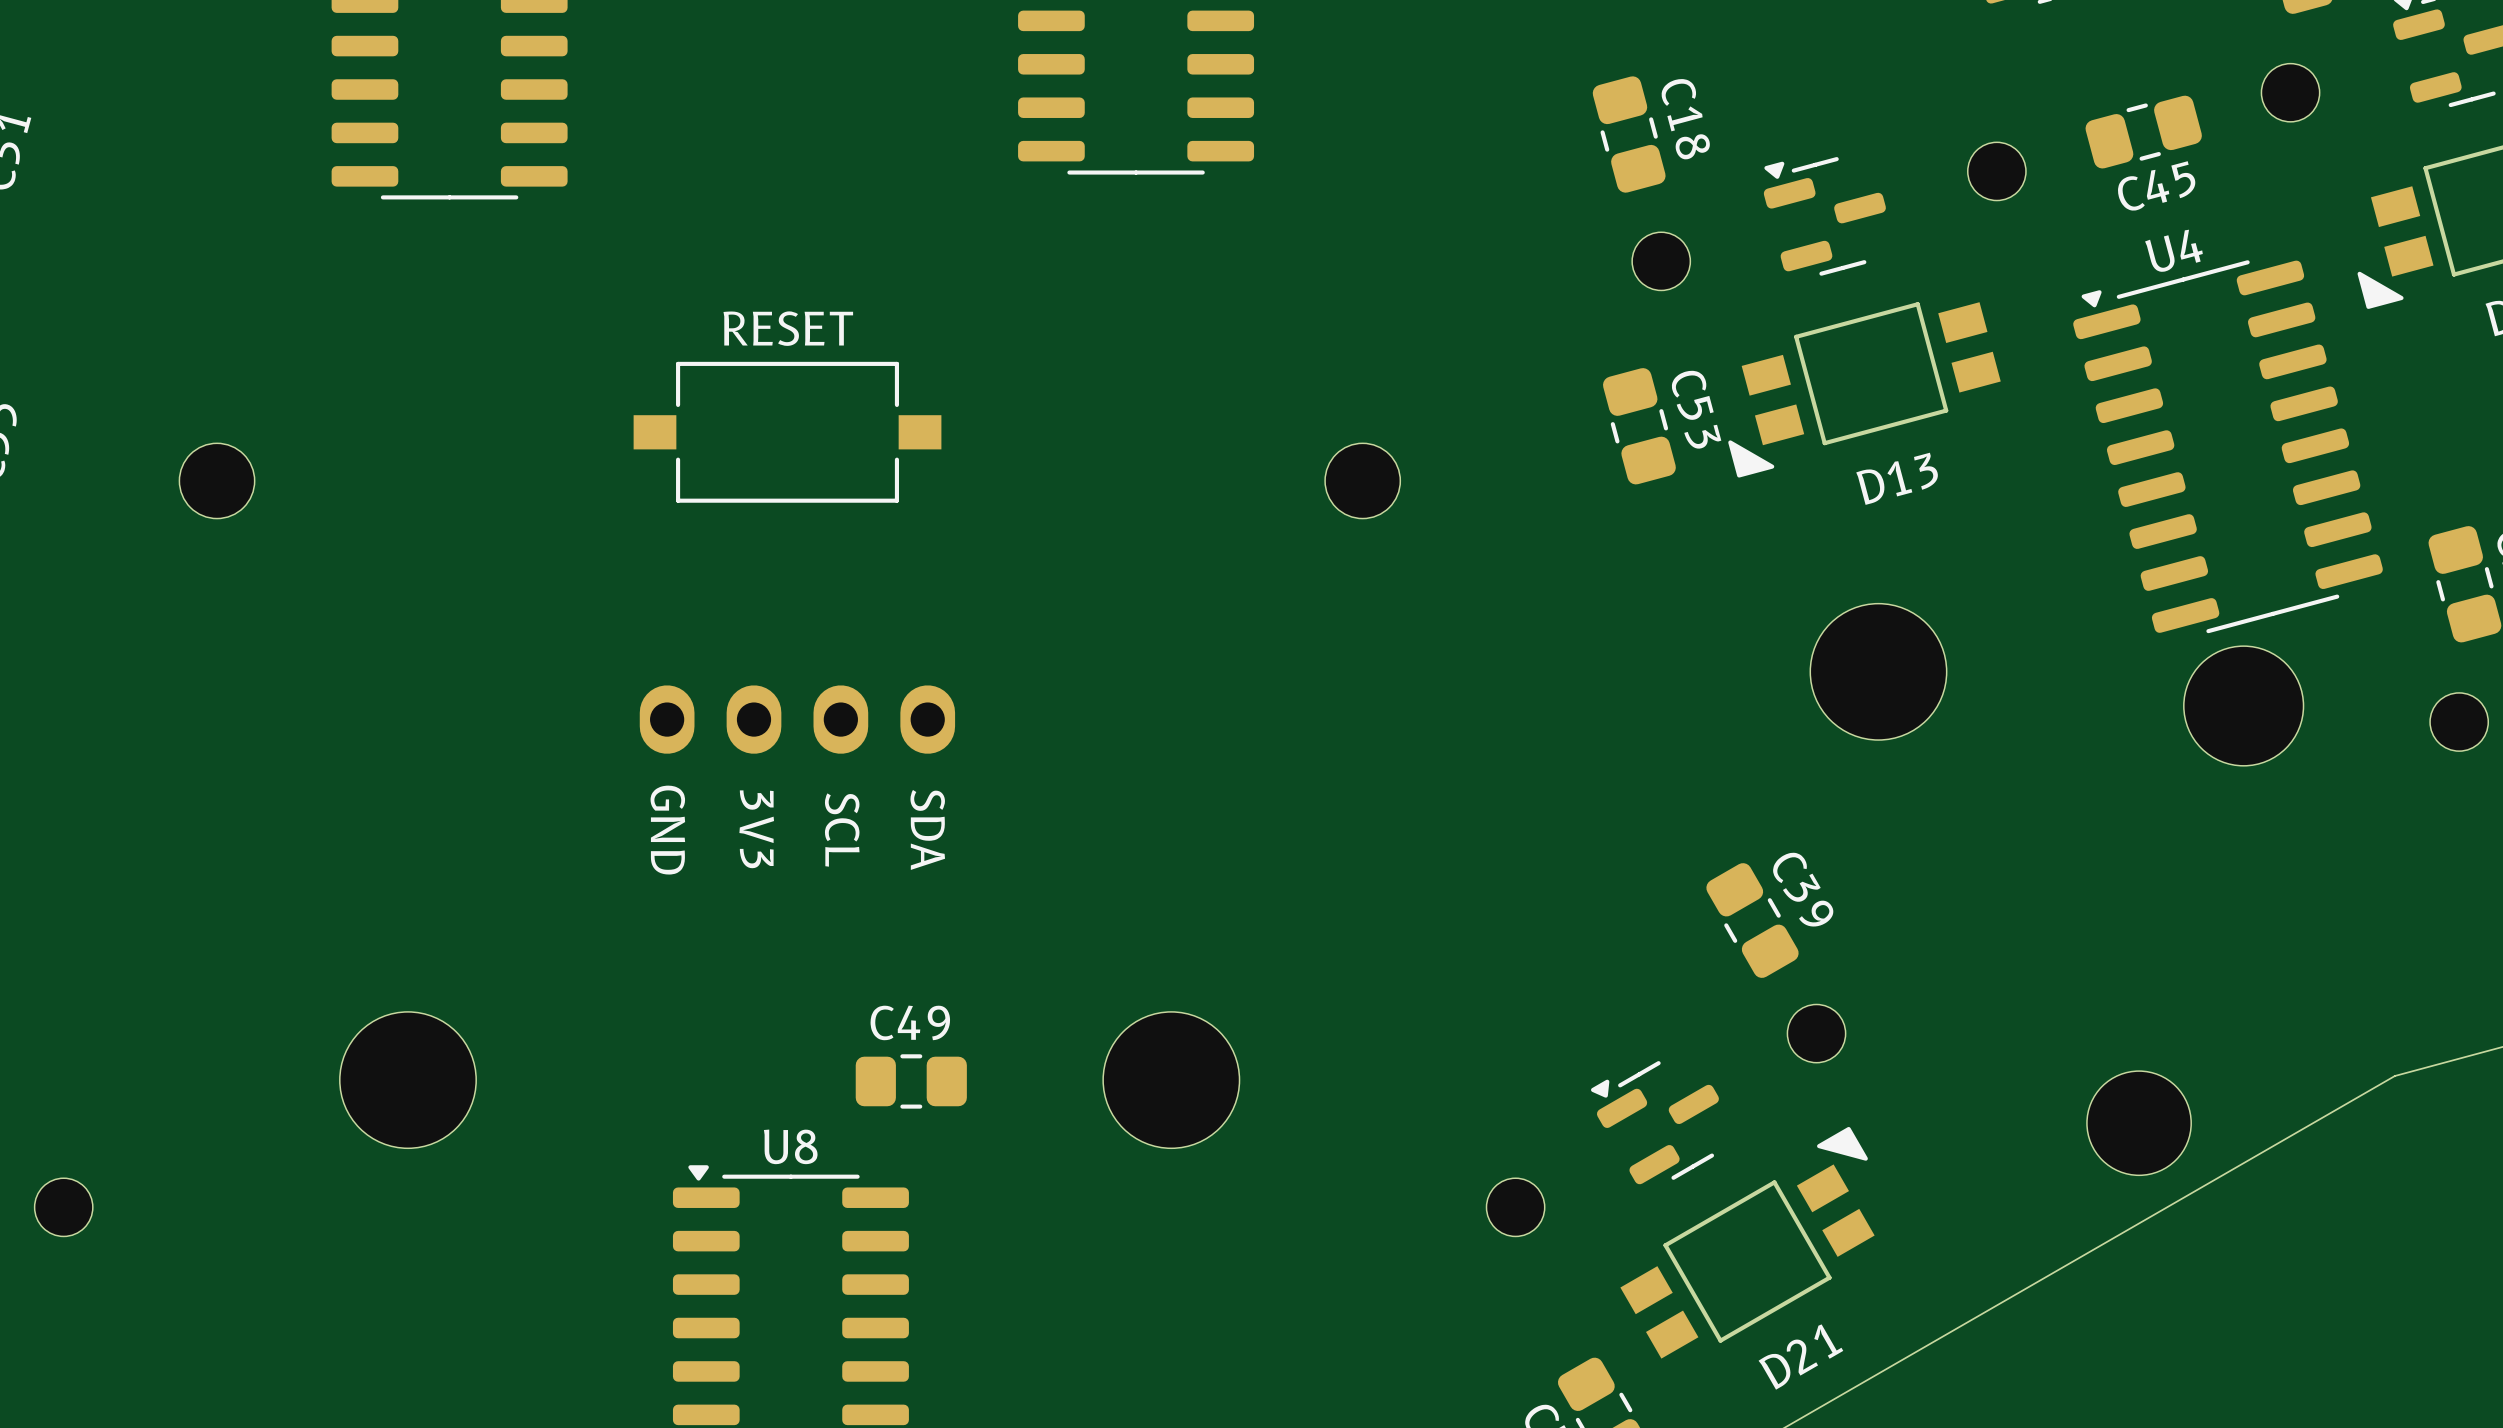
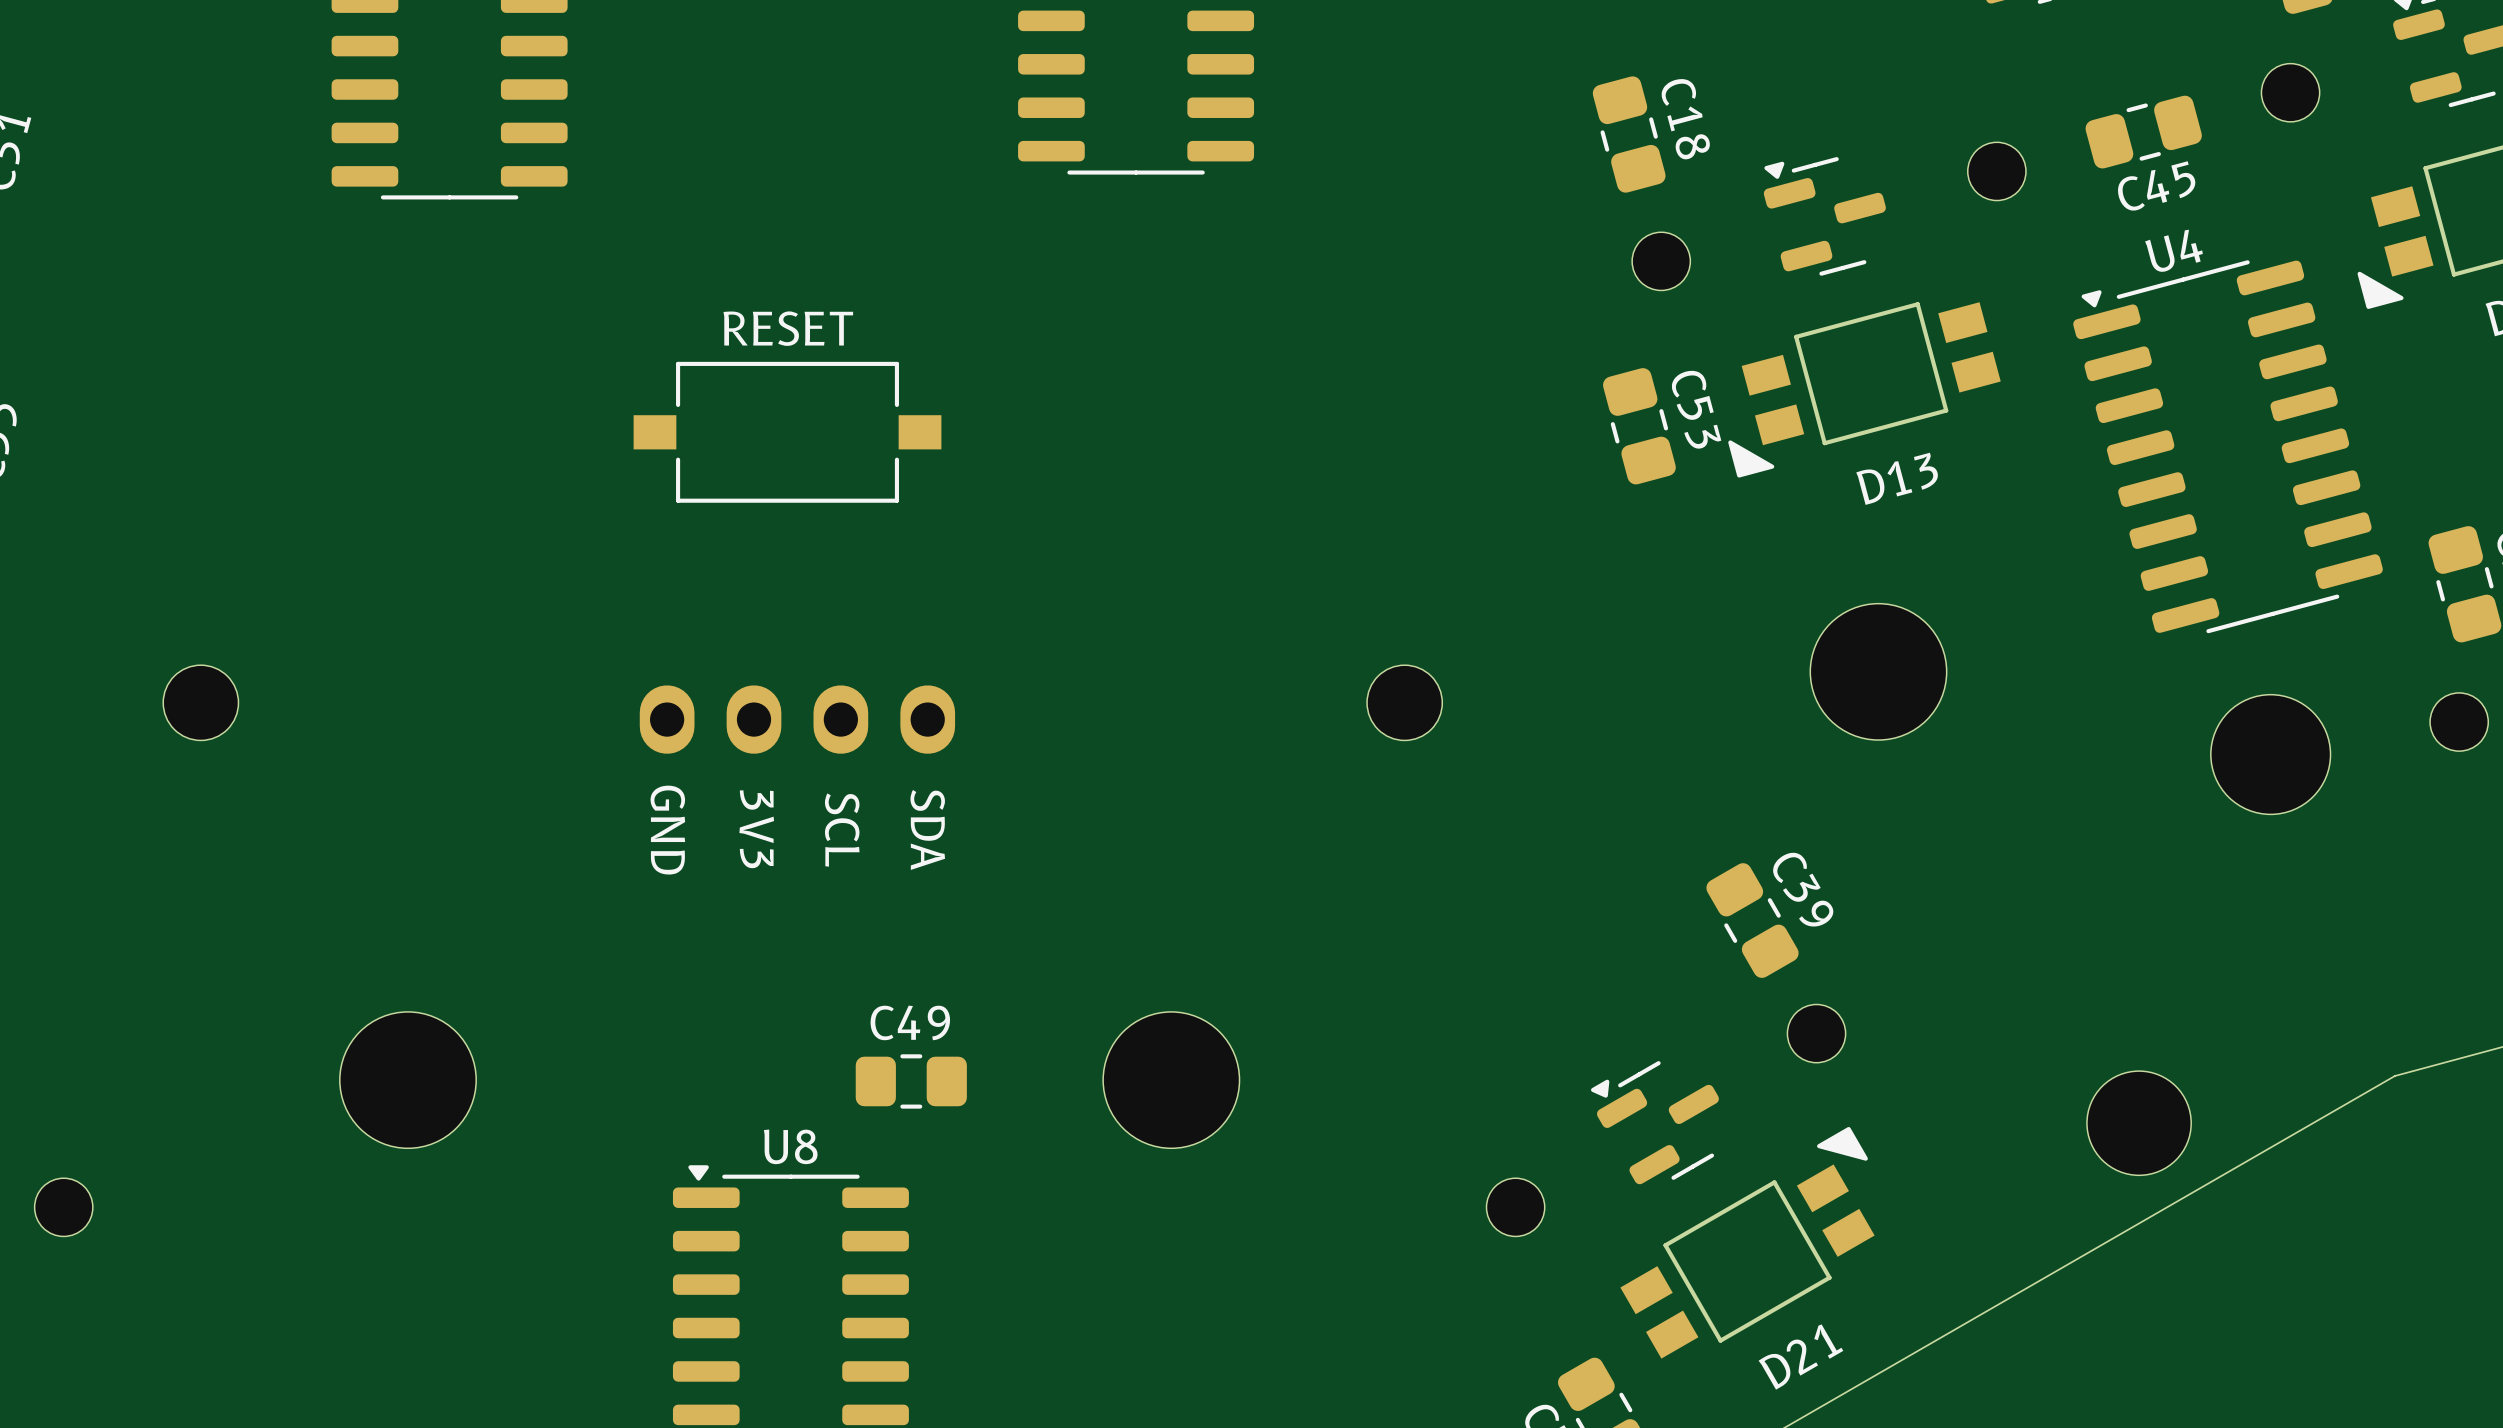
part position: (217, 480) -> (200, 702)
part position: (1362, 480) -> (1404, 702)
part position: (2243, 705) -> (2270, 754)

